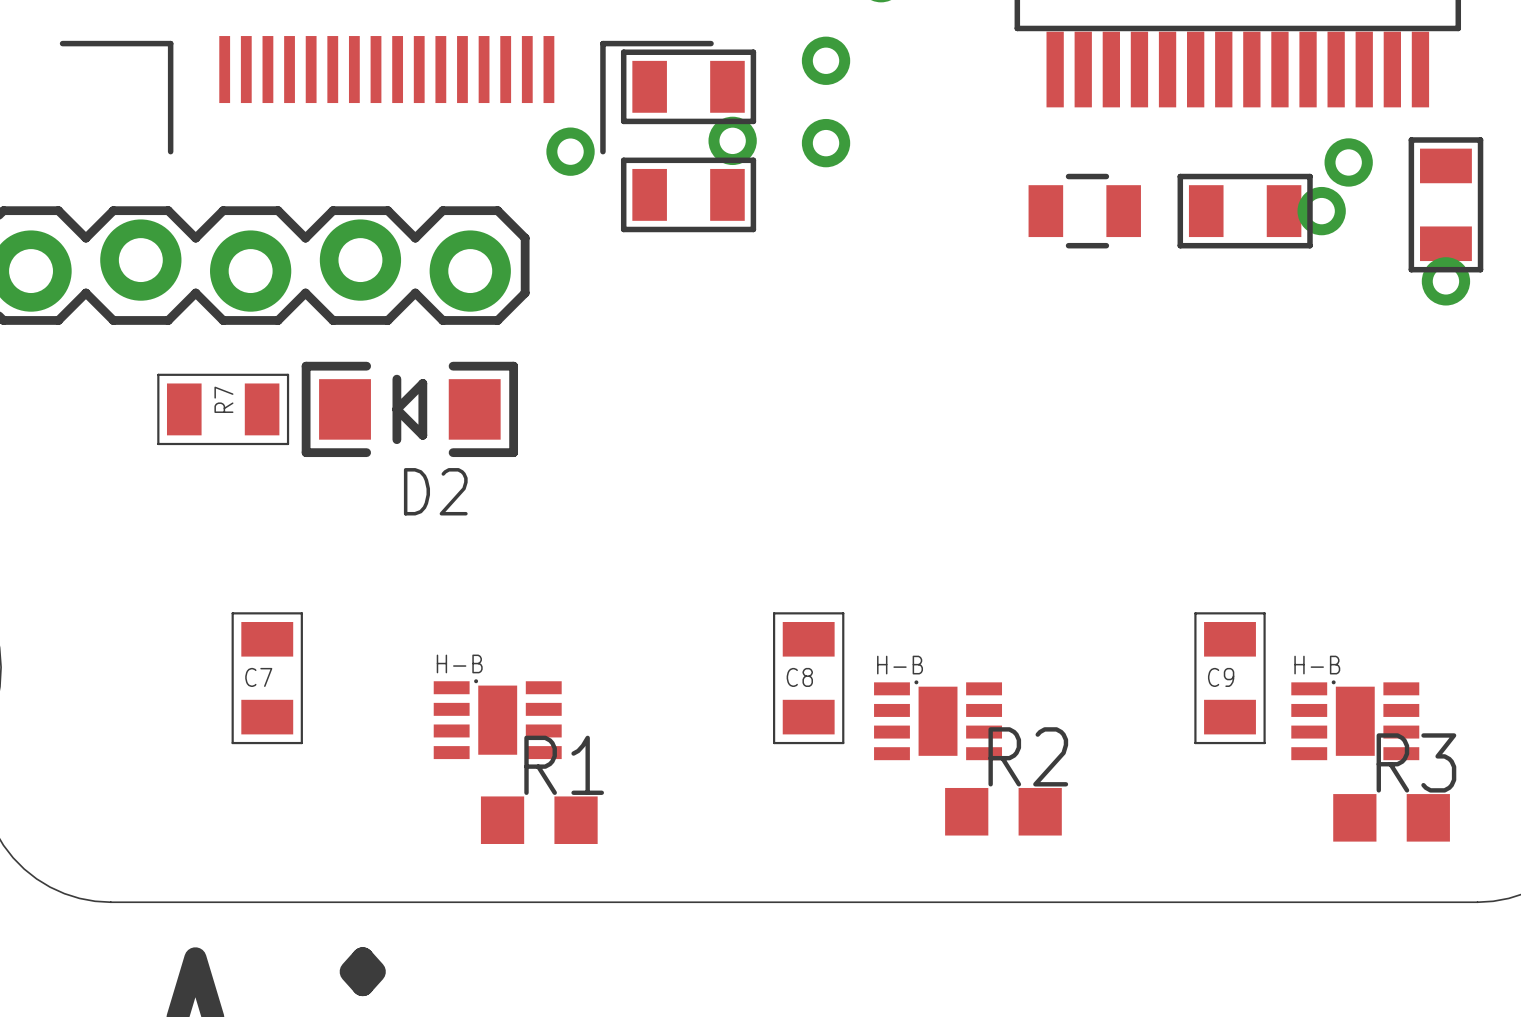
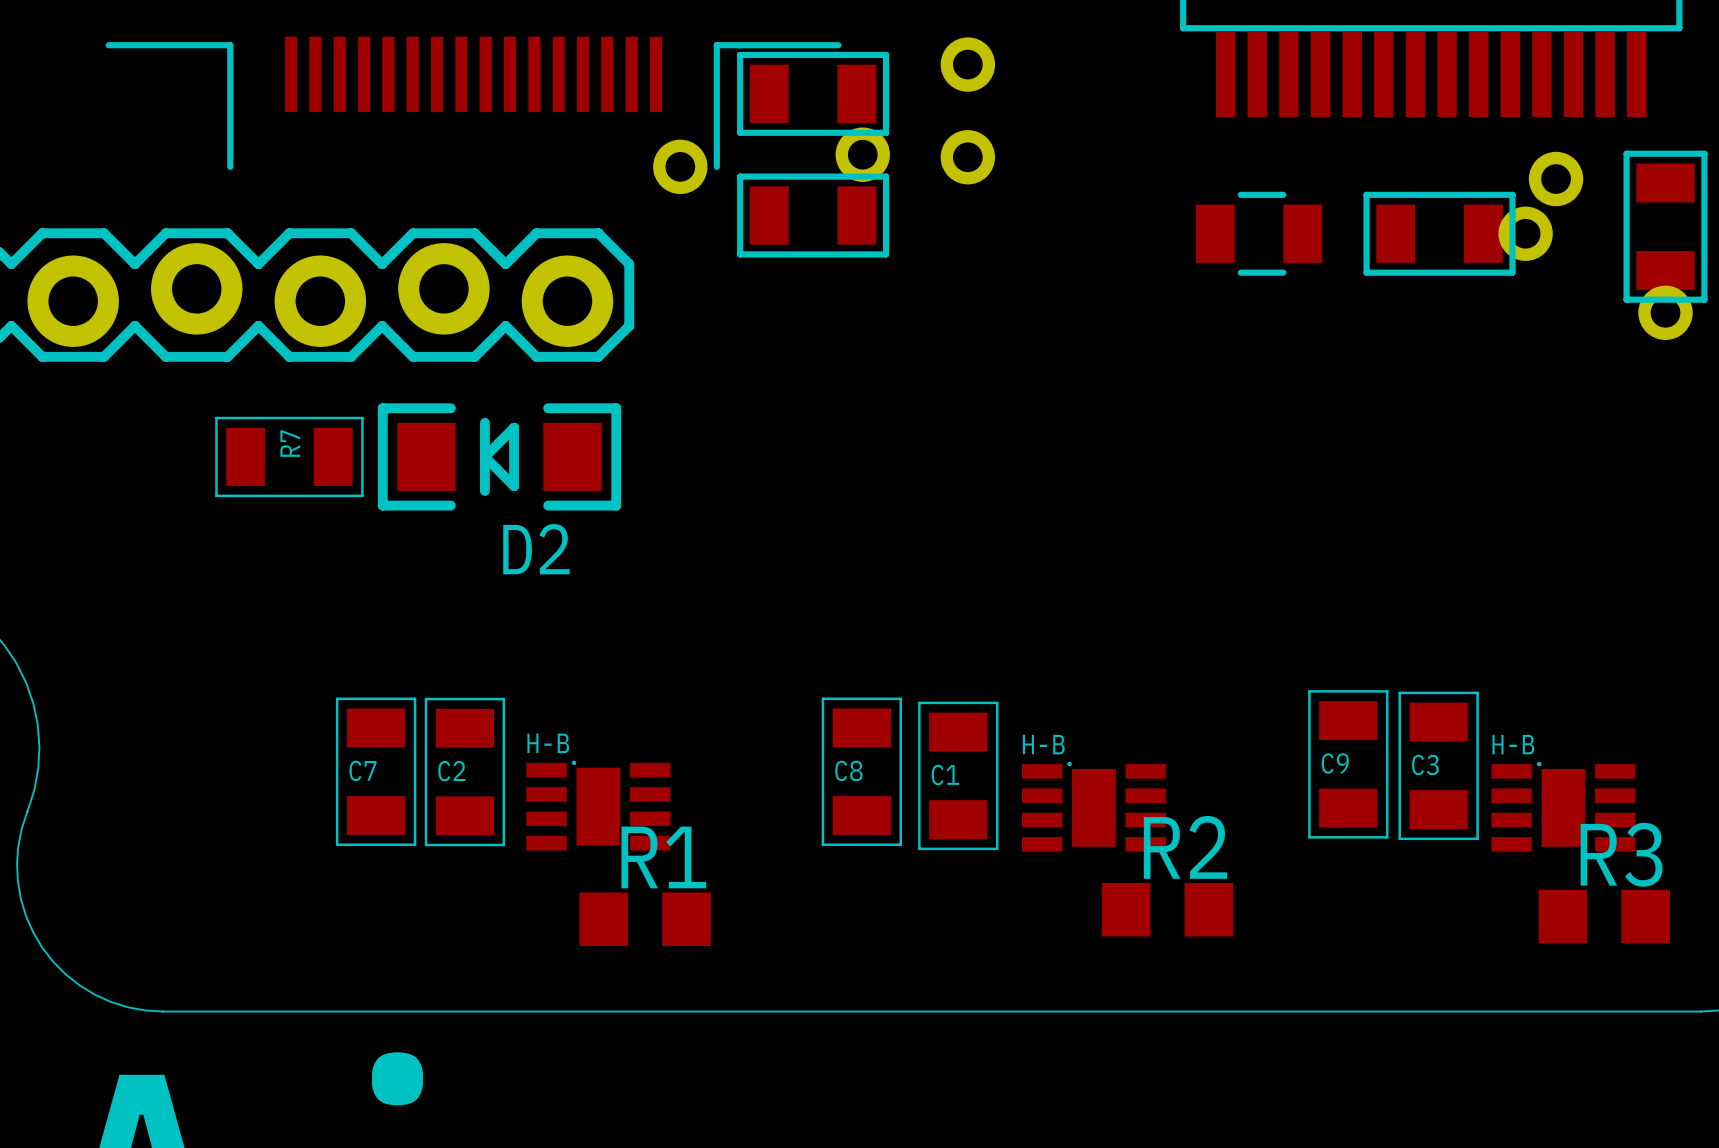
C7 position: (267, 678) -> (376, 771)
C8 position: (808, 678) -> (861, 771)
C9 position: (1230, 678) -> (1348, 764)
C3: none -> (1438, 765)
C2: none -> (464, 772)
C1: none -> (958, 775)

